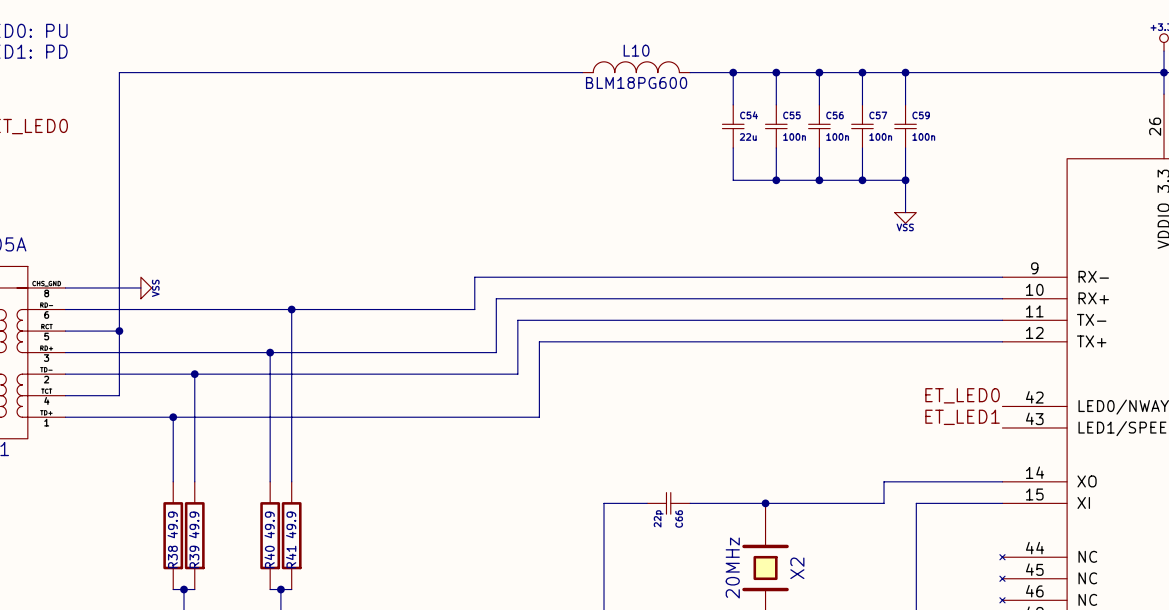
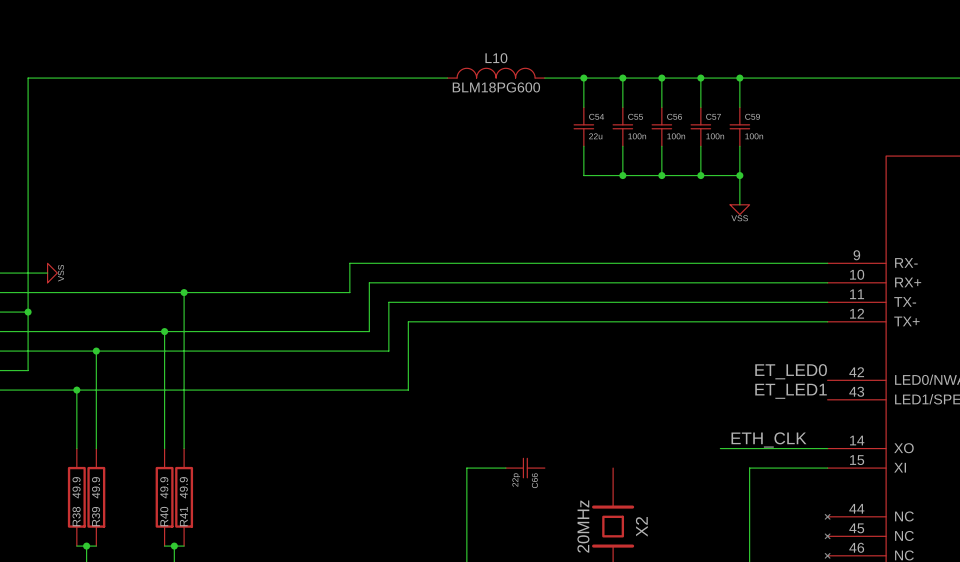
label: none -> ETH_CLK (768, 439)
wire: (884, 481) (884, 503) (690, 503) -> none
junction: (765, 503) -> none

